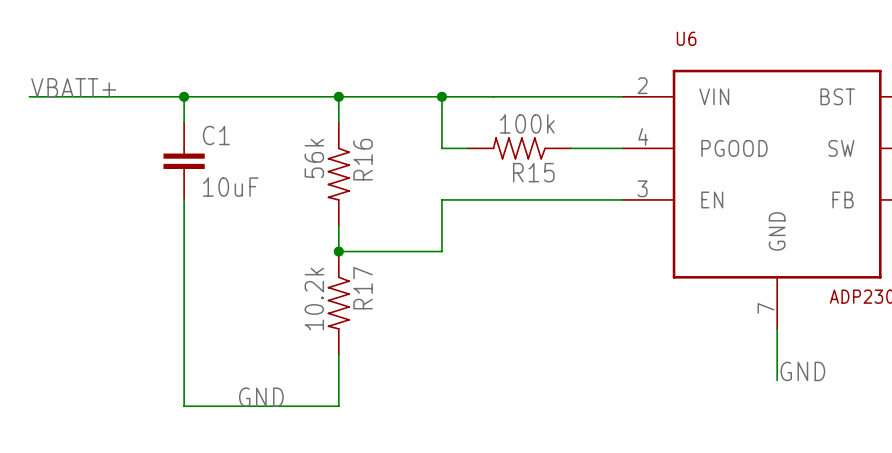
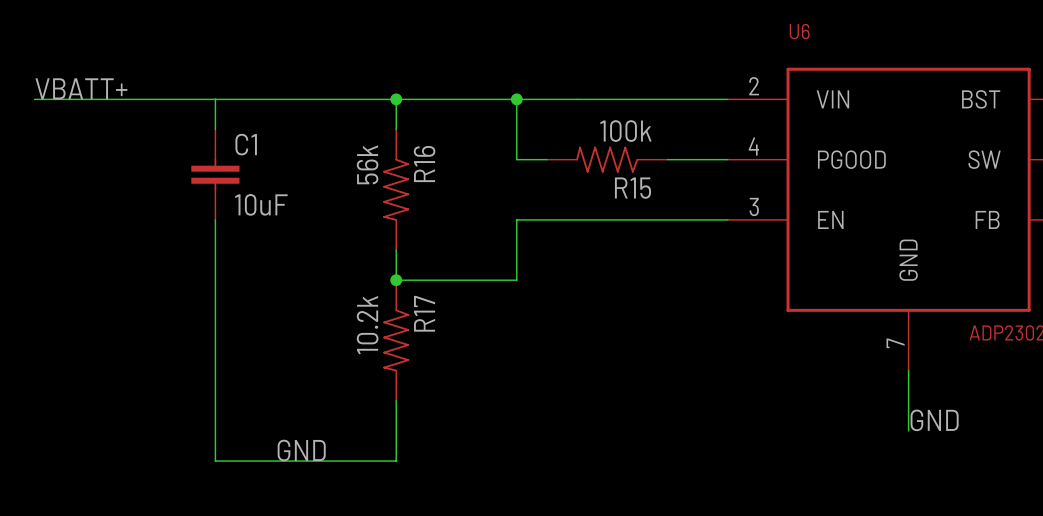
junction: (184, 96) -> none

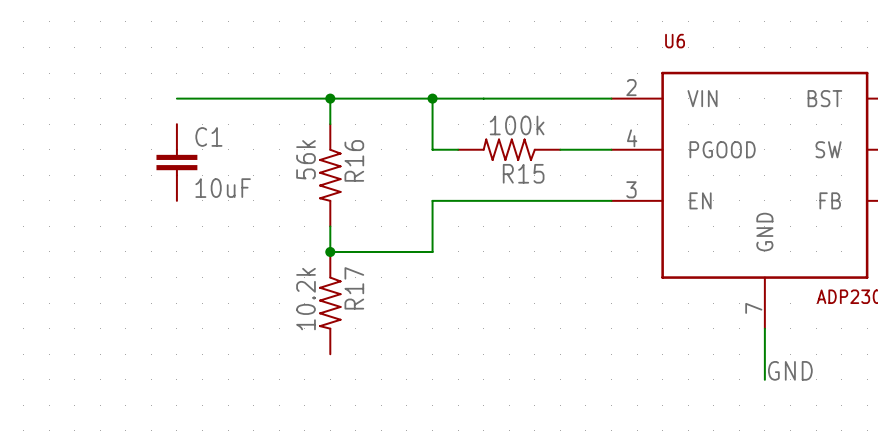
label: VBATT+ (81, 88) -> none
wire: (34, 99) (215, 99) (215, 129) -> none
wire: (215, 219) (215, 461) (396, 461) (396, 400) -> none
label: GND (301, 450) -> none

